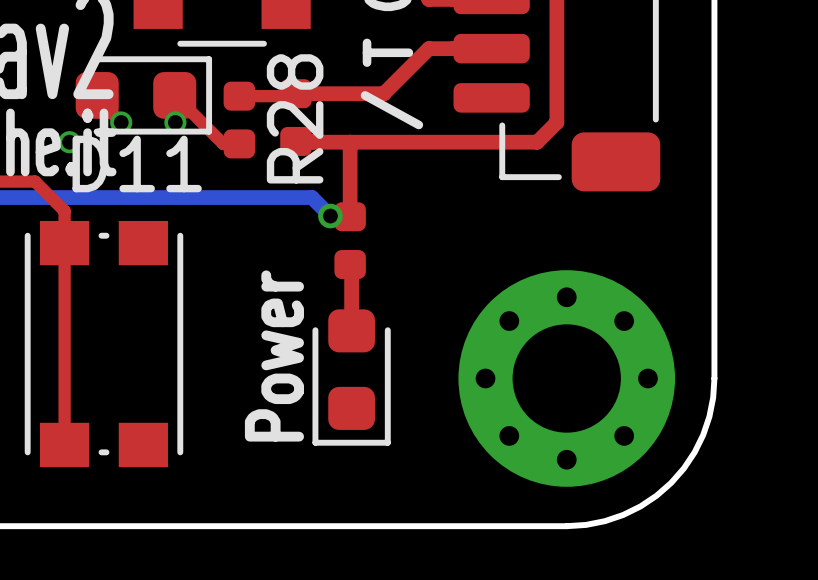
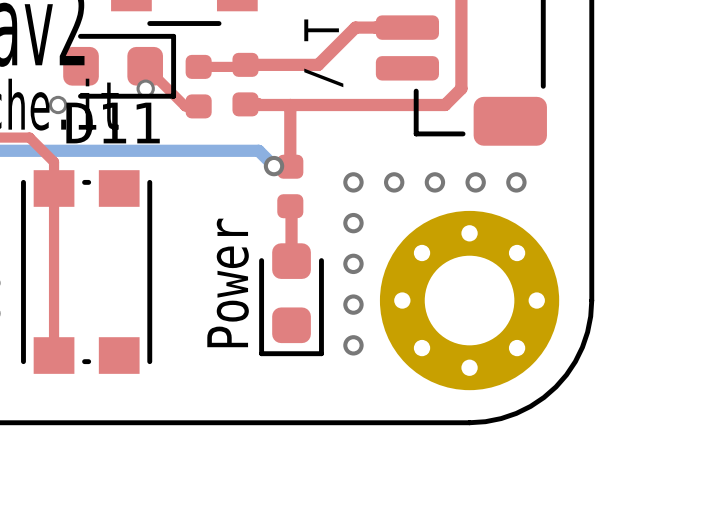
R28 name: R28 (295, 118) -> none
via: (121, 122) -> none
via: none -> (353, 182)
via: none -> (394, 182)
via: none -> (434, 182)
via: none -> (475, 182)
via: none -> (516, 182)
via: none -> (353, 223)
via: none -> (353, 263)
via: none -> (353, 304)
via: none -> (353, 345)

